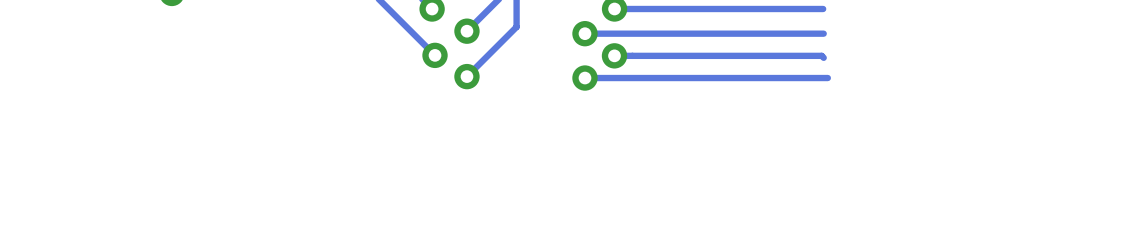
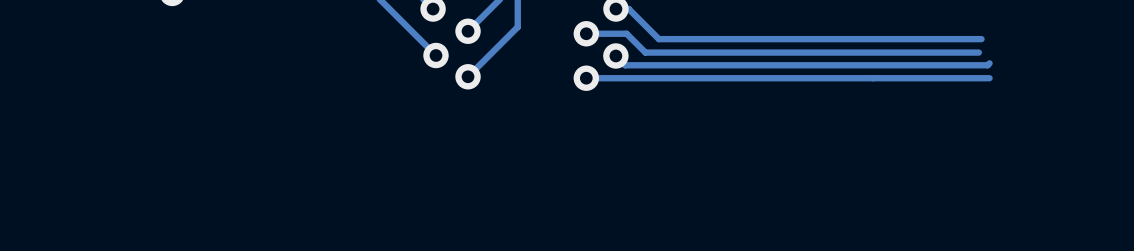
track: (823, 8) (627, 8) -> (981, 39) (658, 39) (628, 9)
track: (823, 33) (625, 33) -> (978, 52) (645, 52) (626, 33)
track: (614, 55) (821, 55) (823, 57) -> (615, 55) (625, 65) (987, 65) (989, 63)
track: none -> (989, 78) (829, 78)

